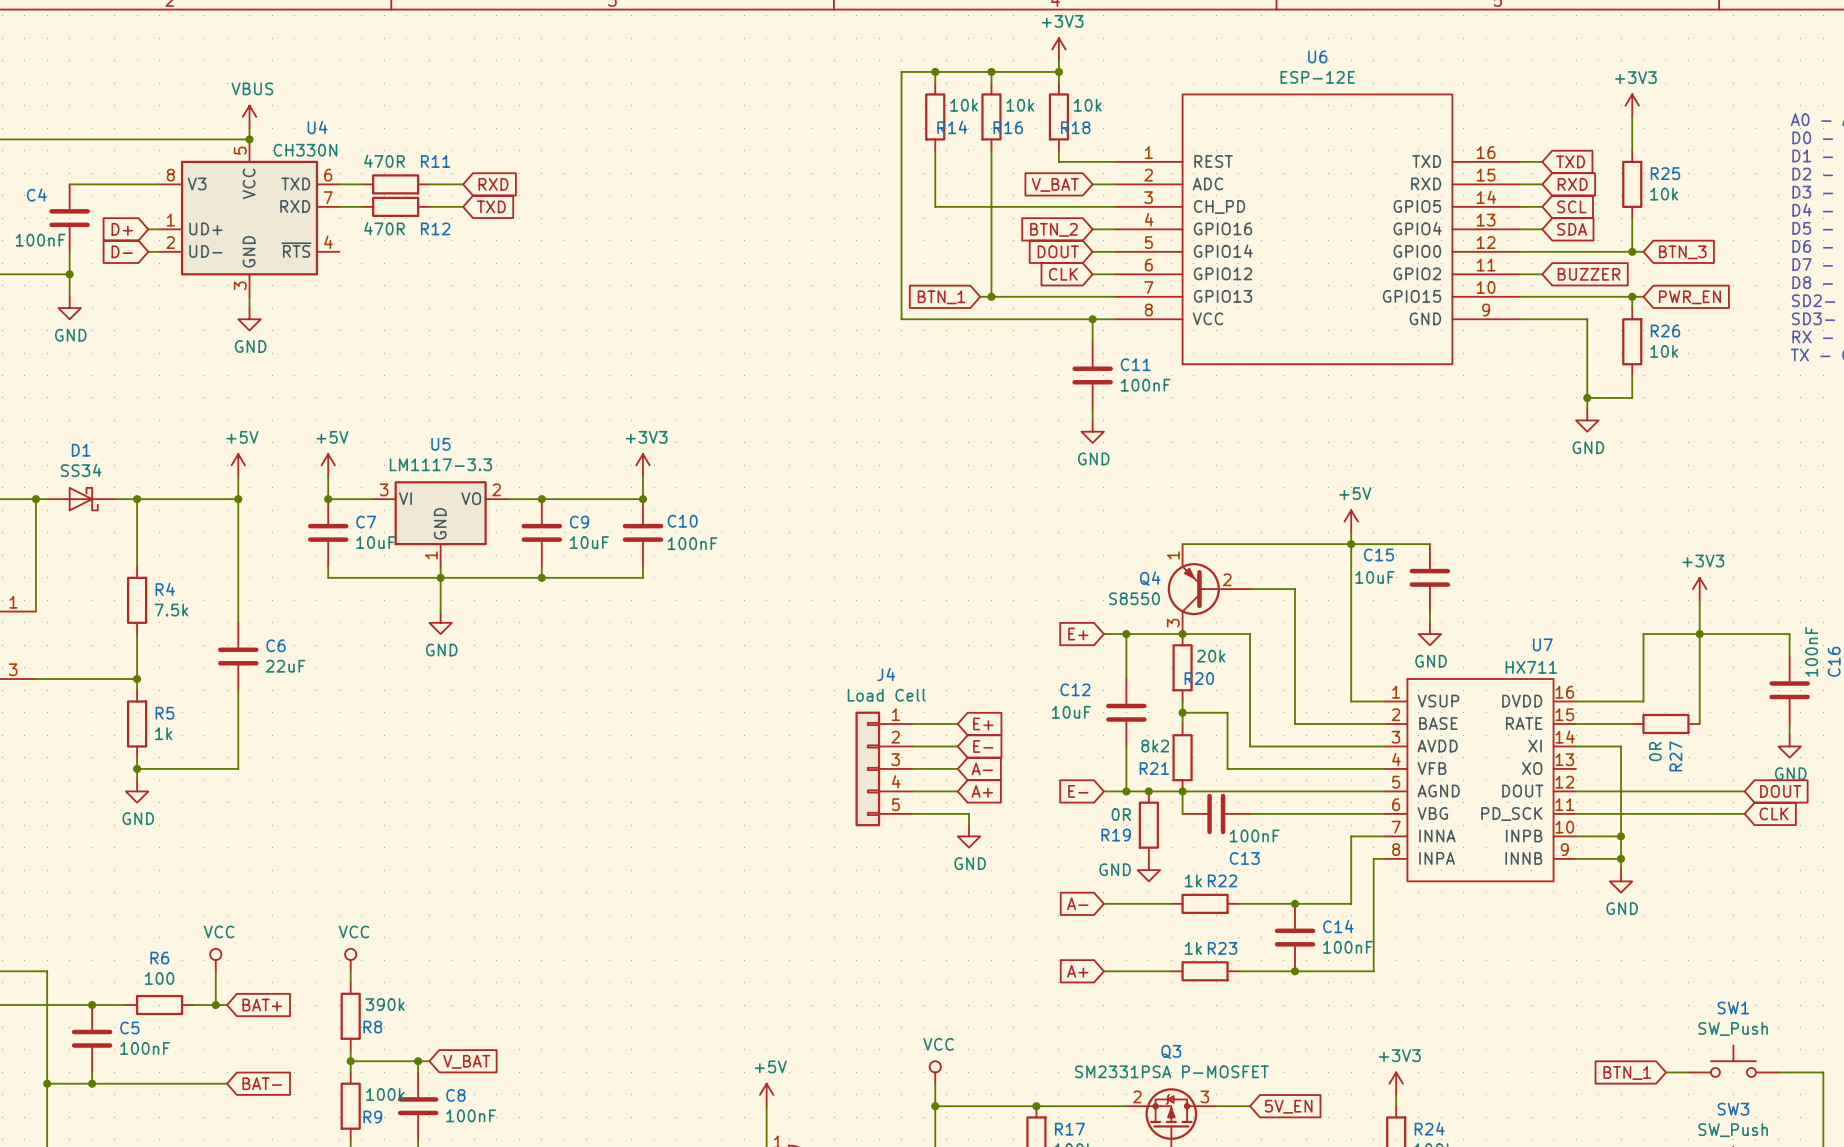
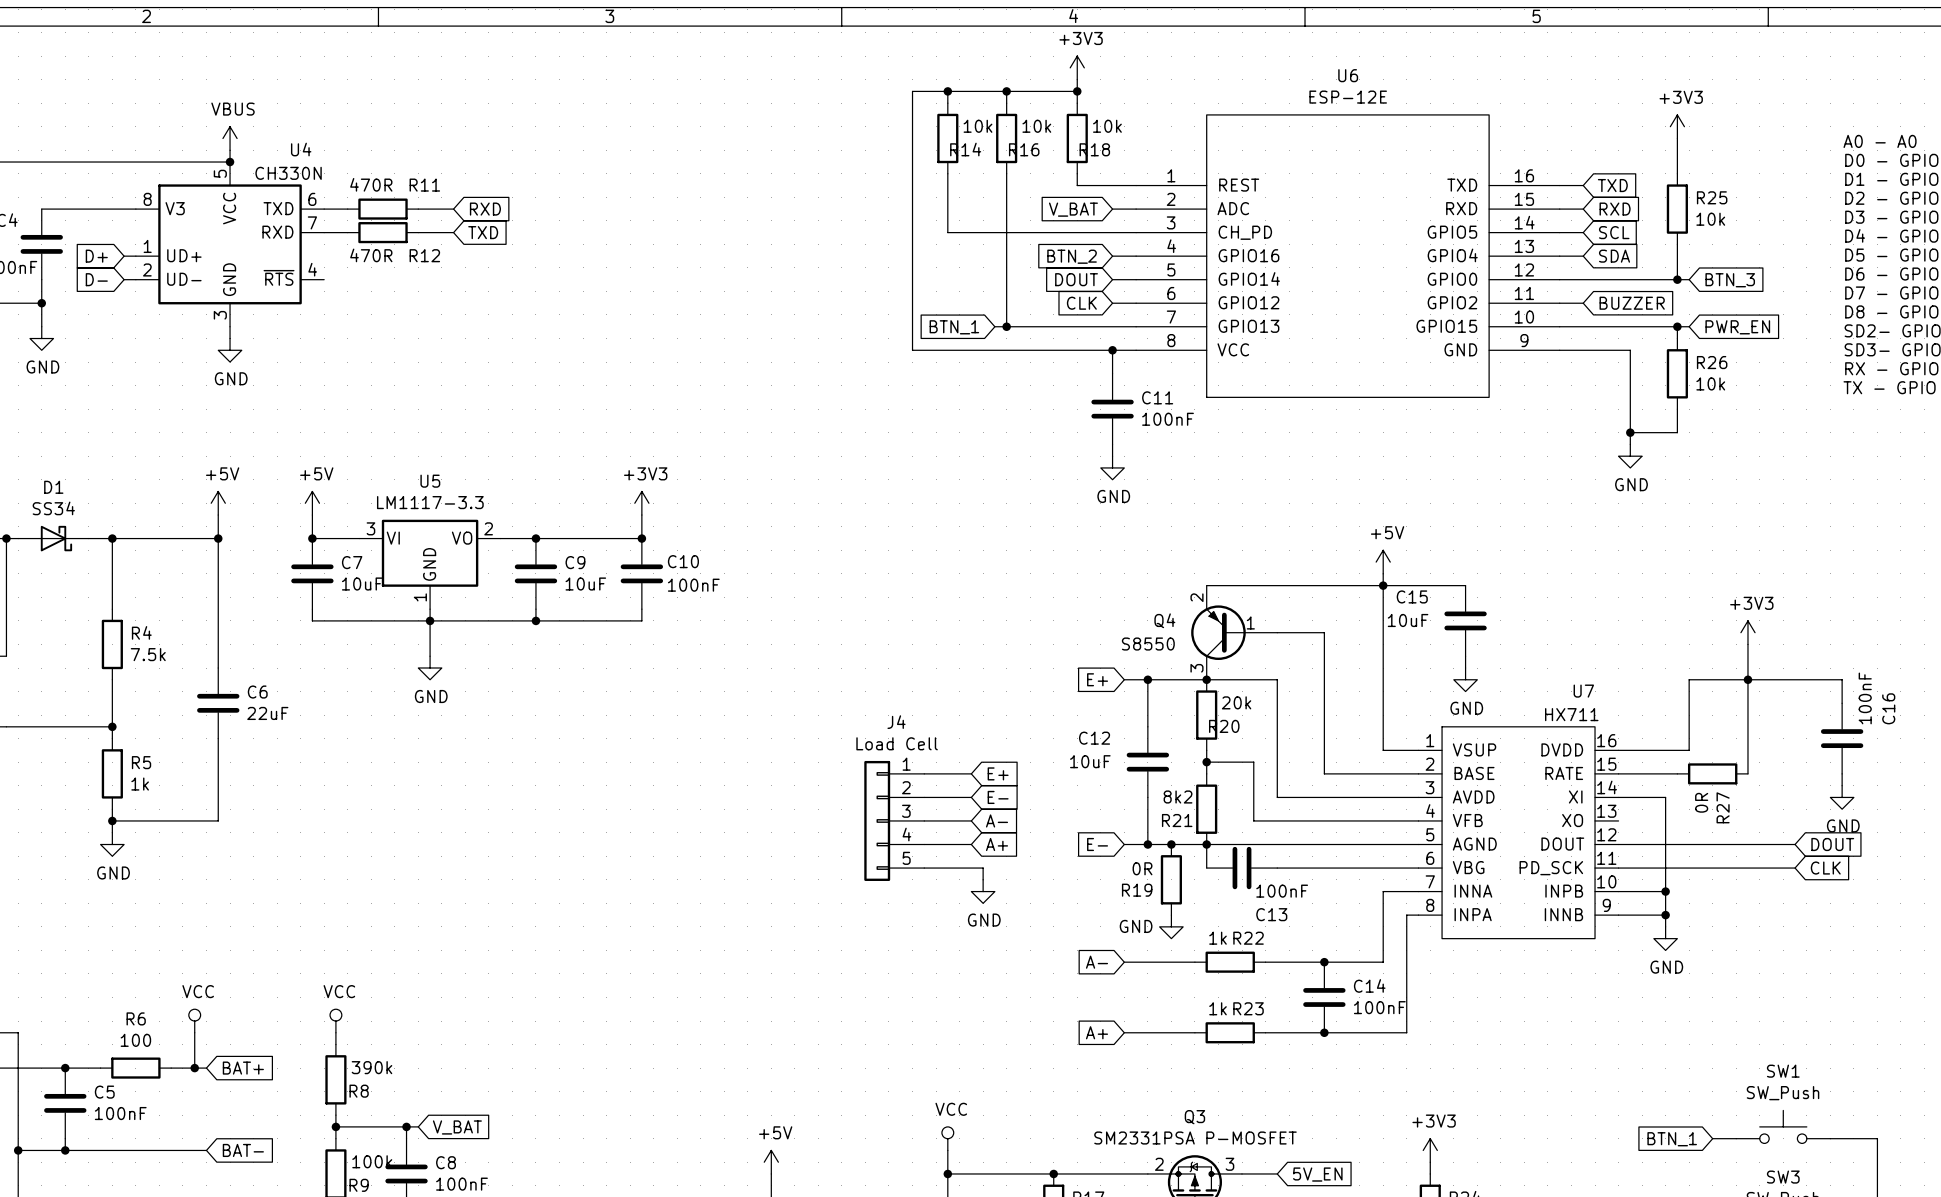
Q4 symbol: [1167, 544, 1251, 635] -> [1191, 585, 1278, 680]

